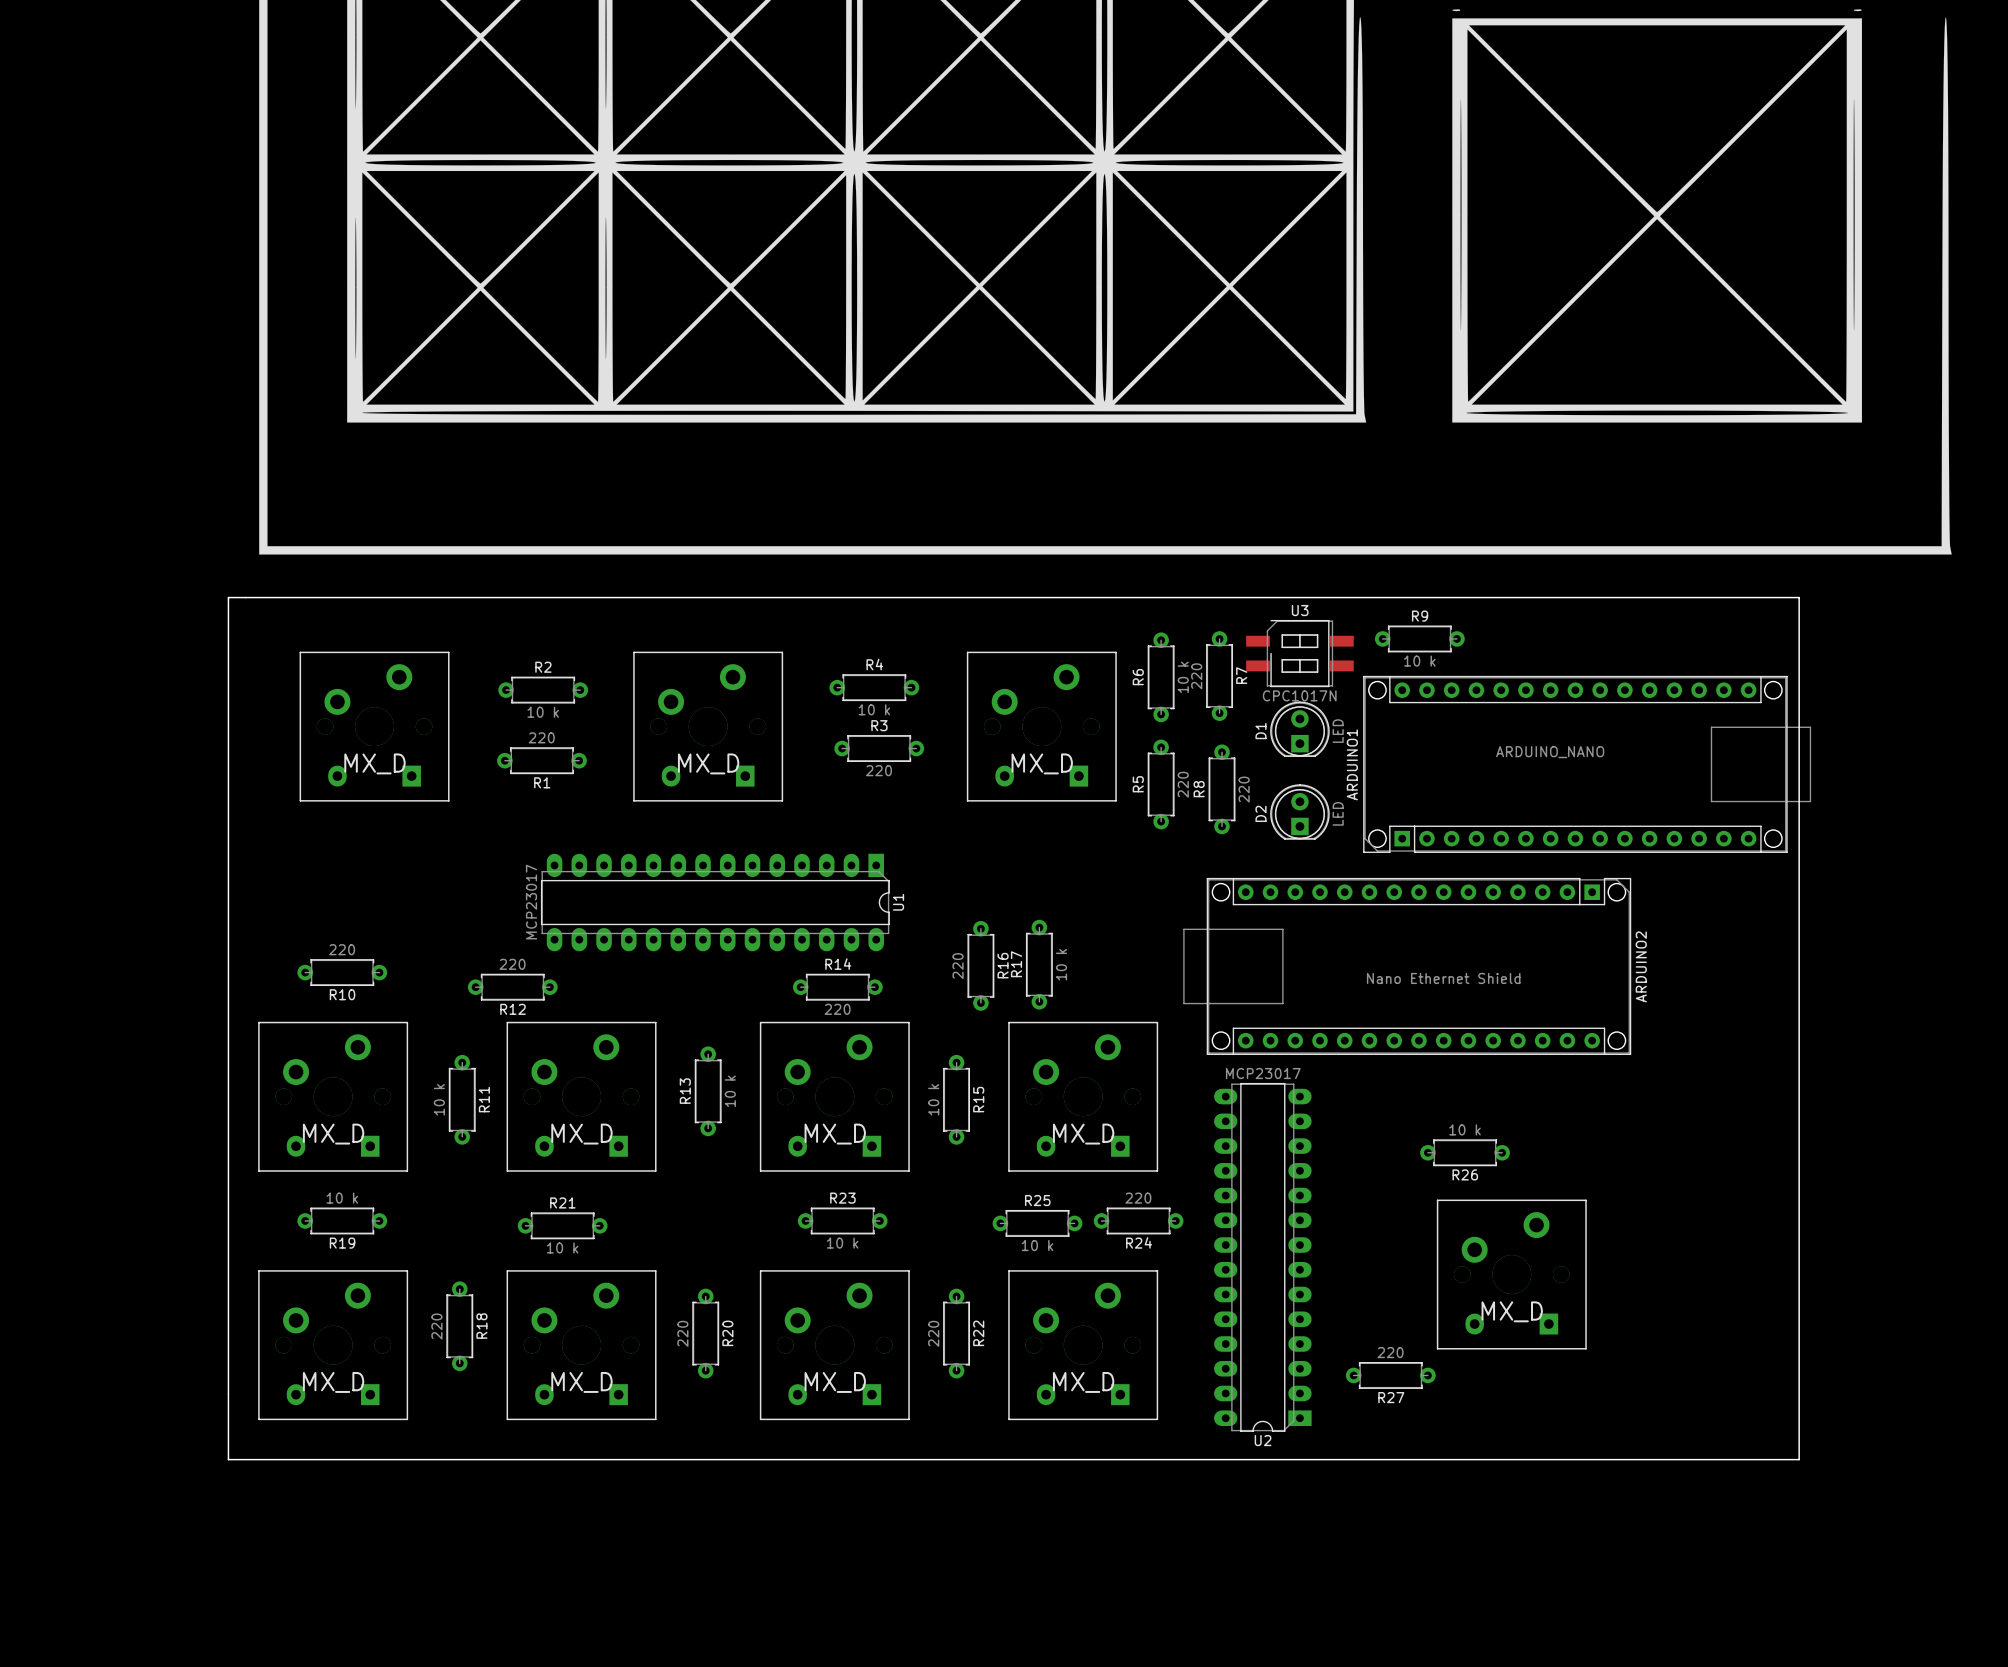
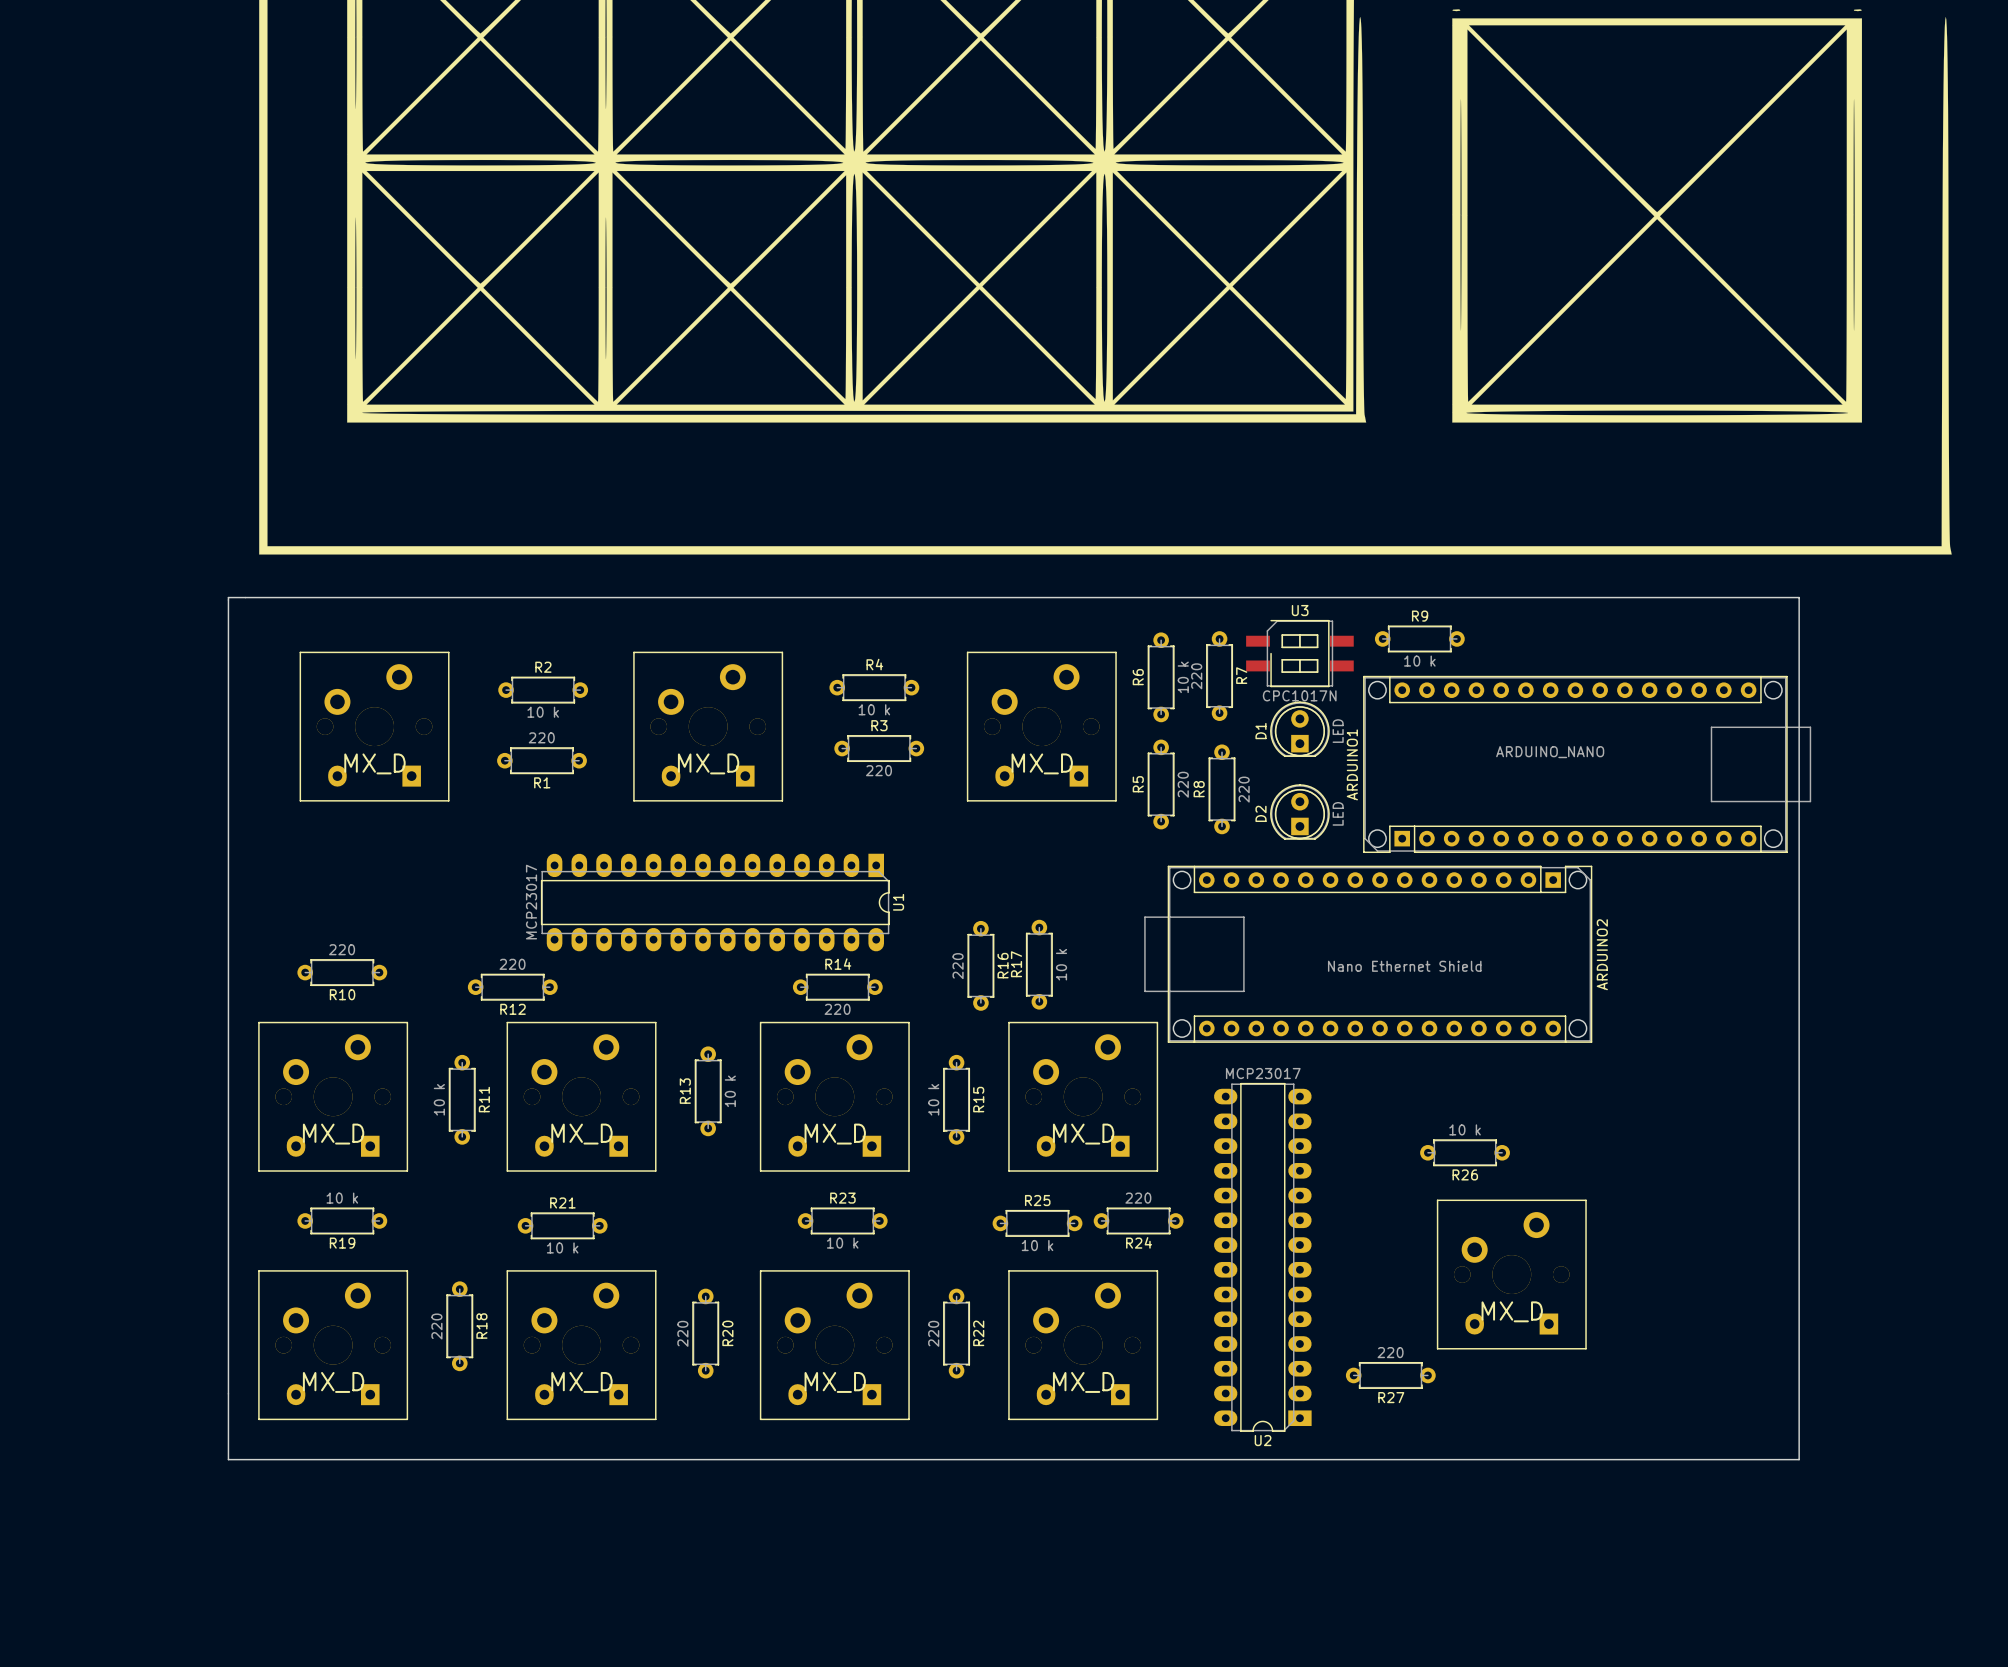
ARDUINO2 position: (1407, 966) -> (1368, 954)

